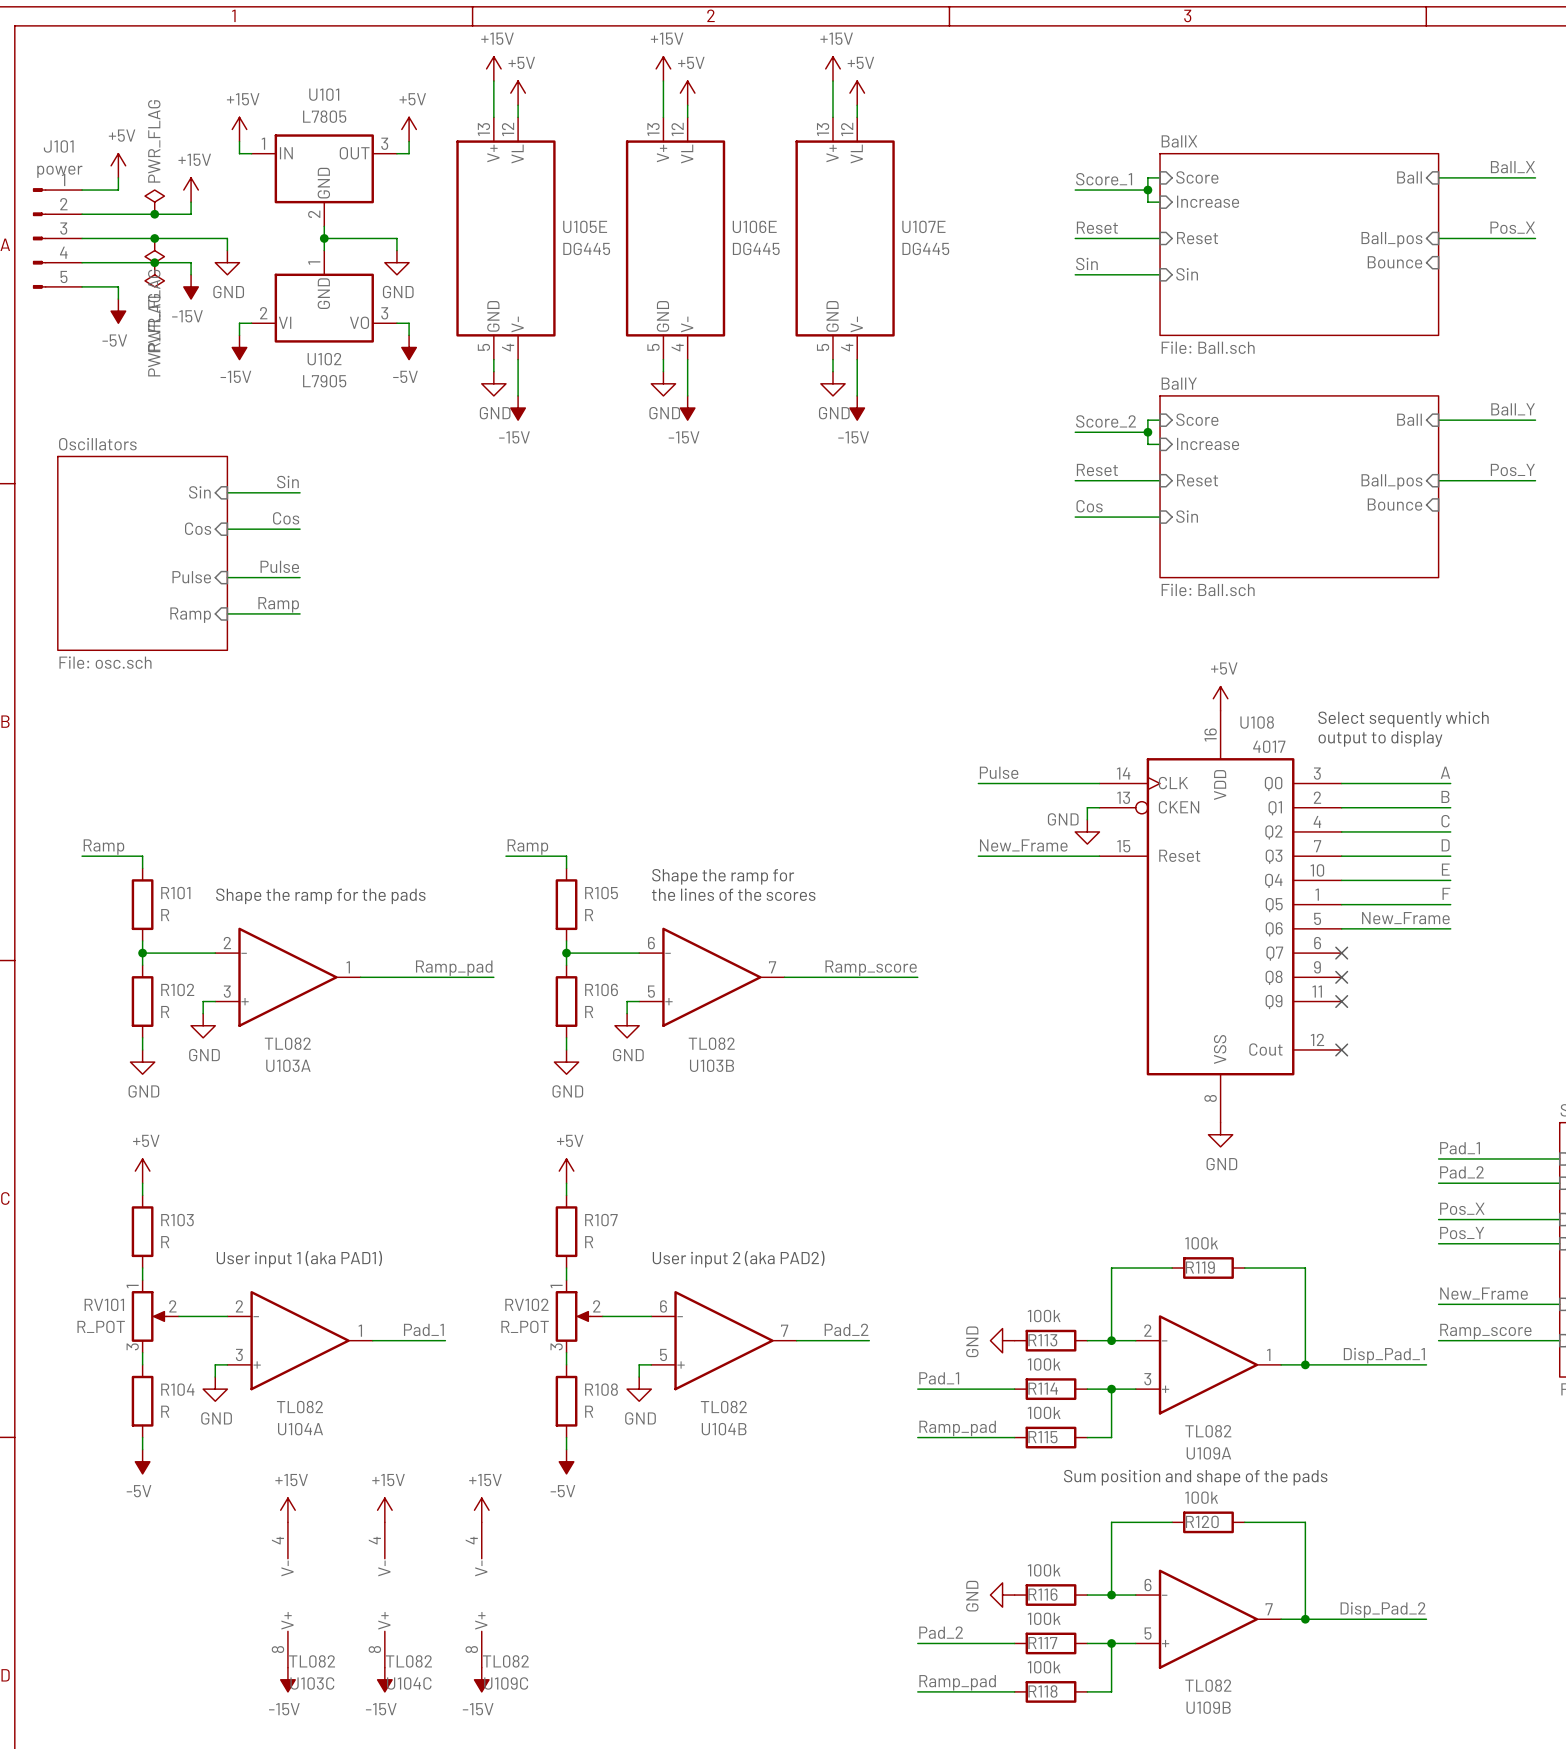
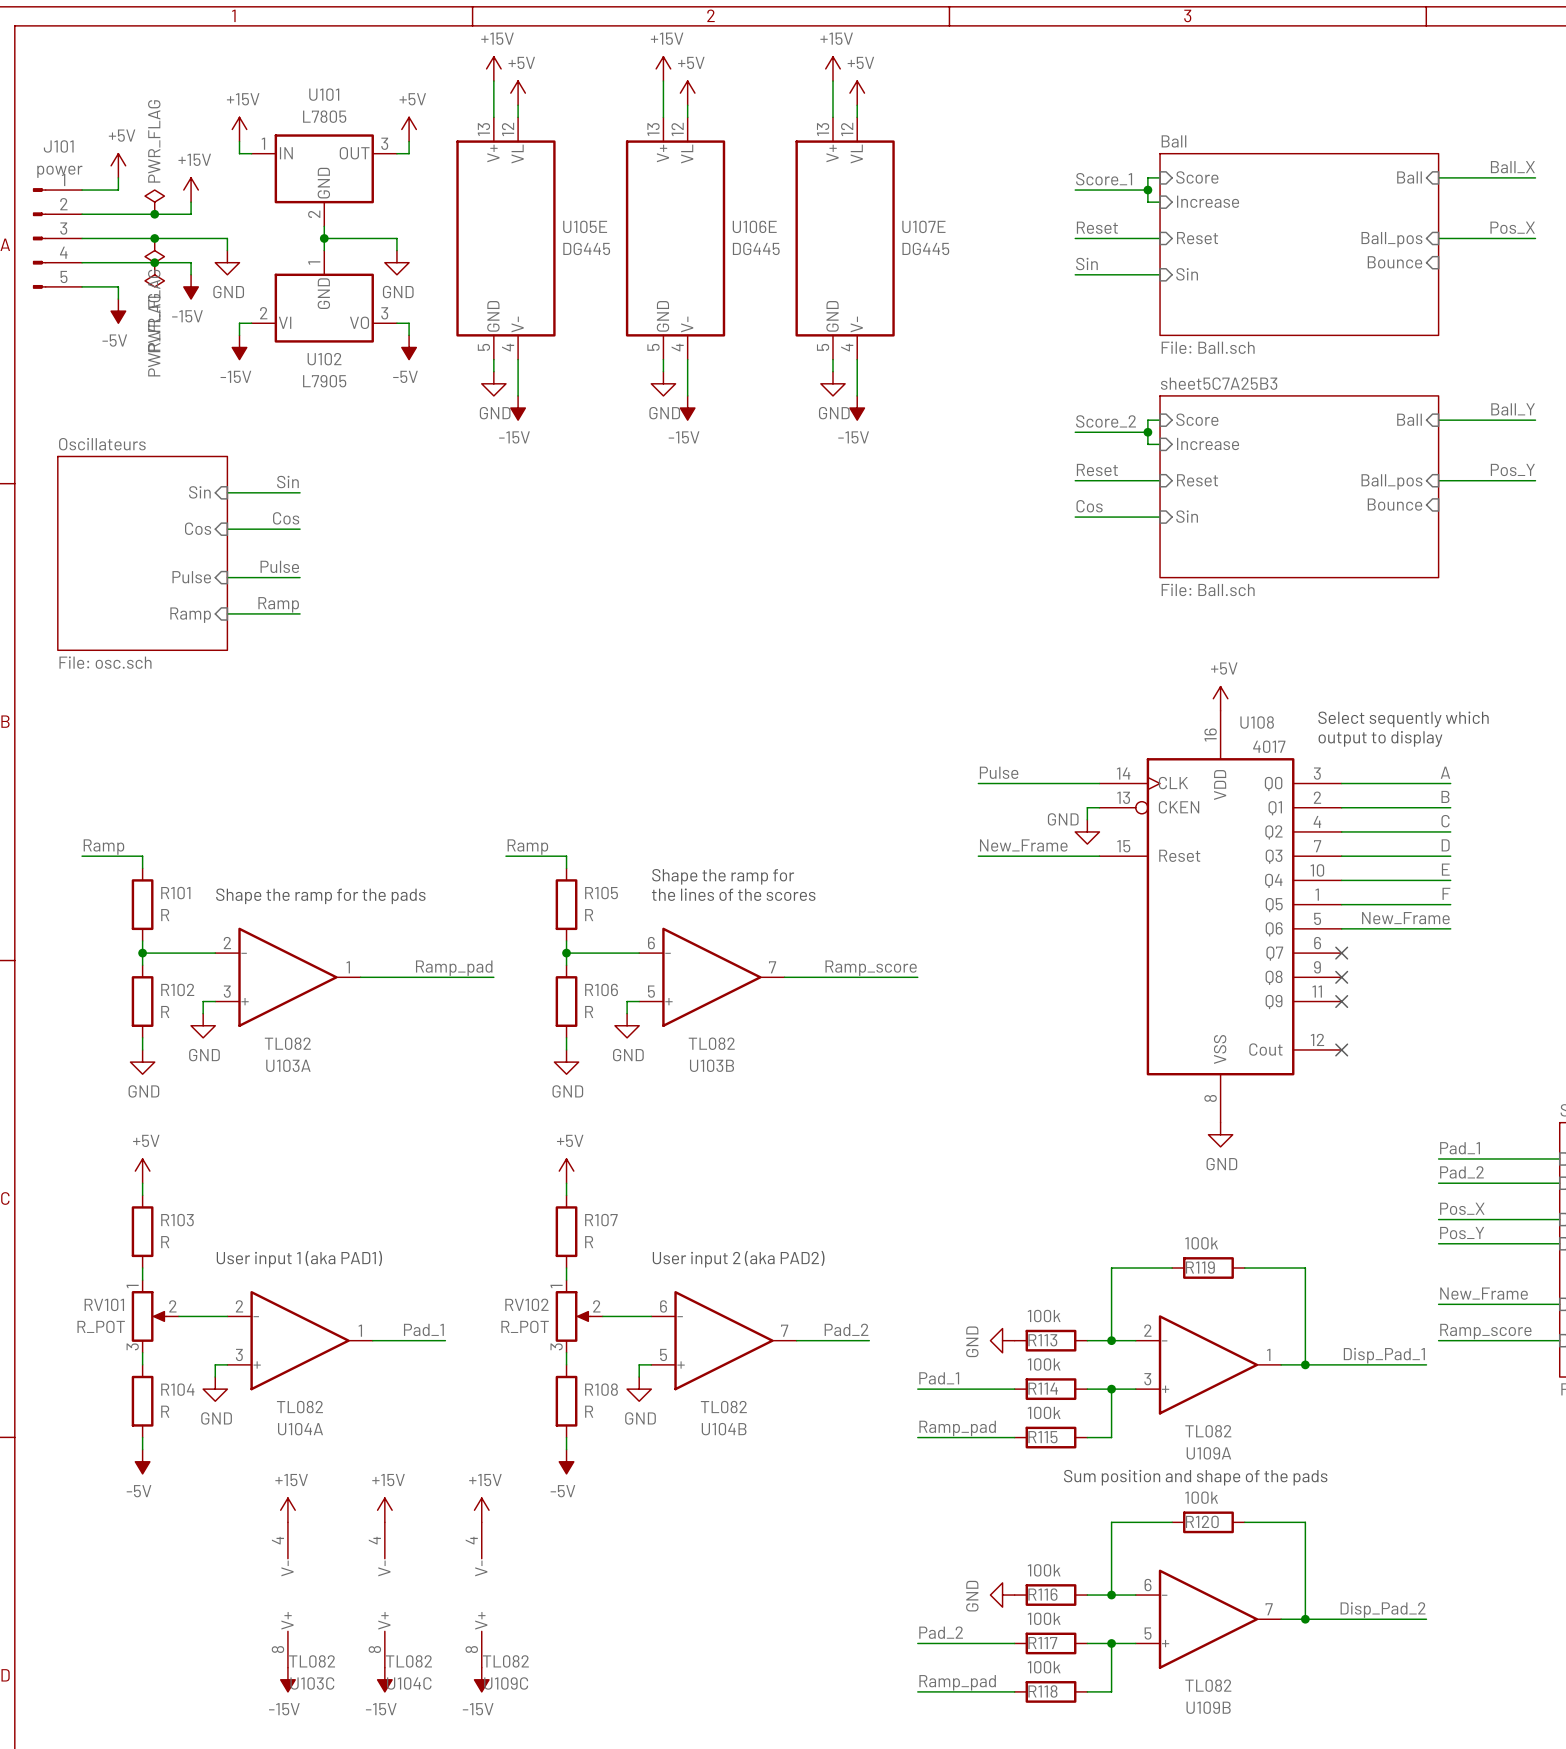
sheet BallX name: BallX (1179, 141) -> Ball (1173, 141)
sheet BallY name: BallY (1179, 383) -> sheet5C7A25B3 (1219, 383)
sheet Oscillators name: Oscillators (97, 444) -> Oscillateurs (102, 444)

